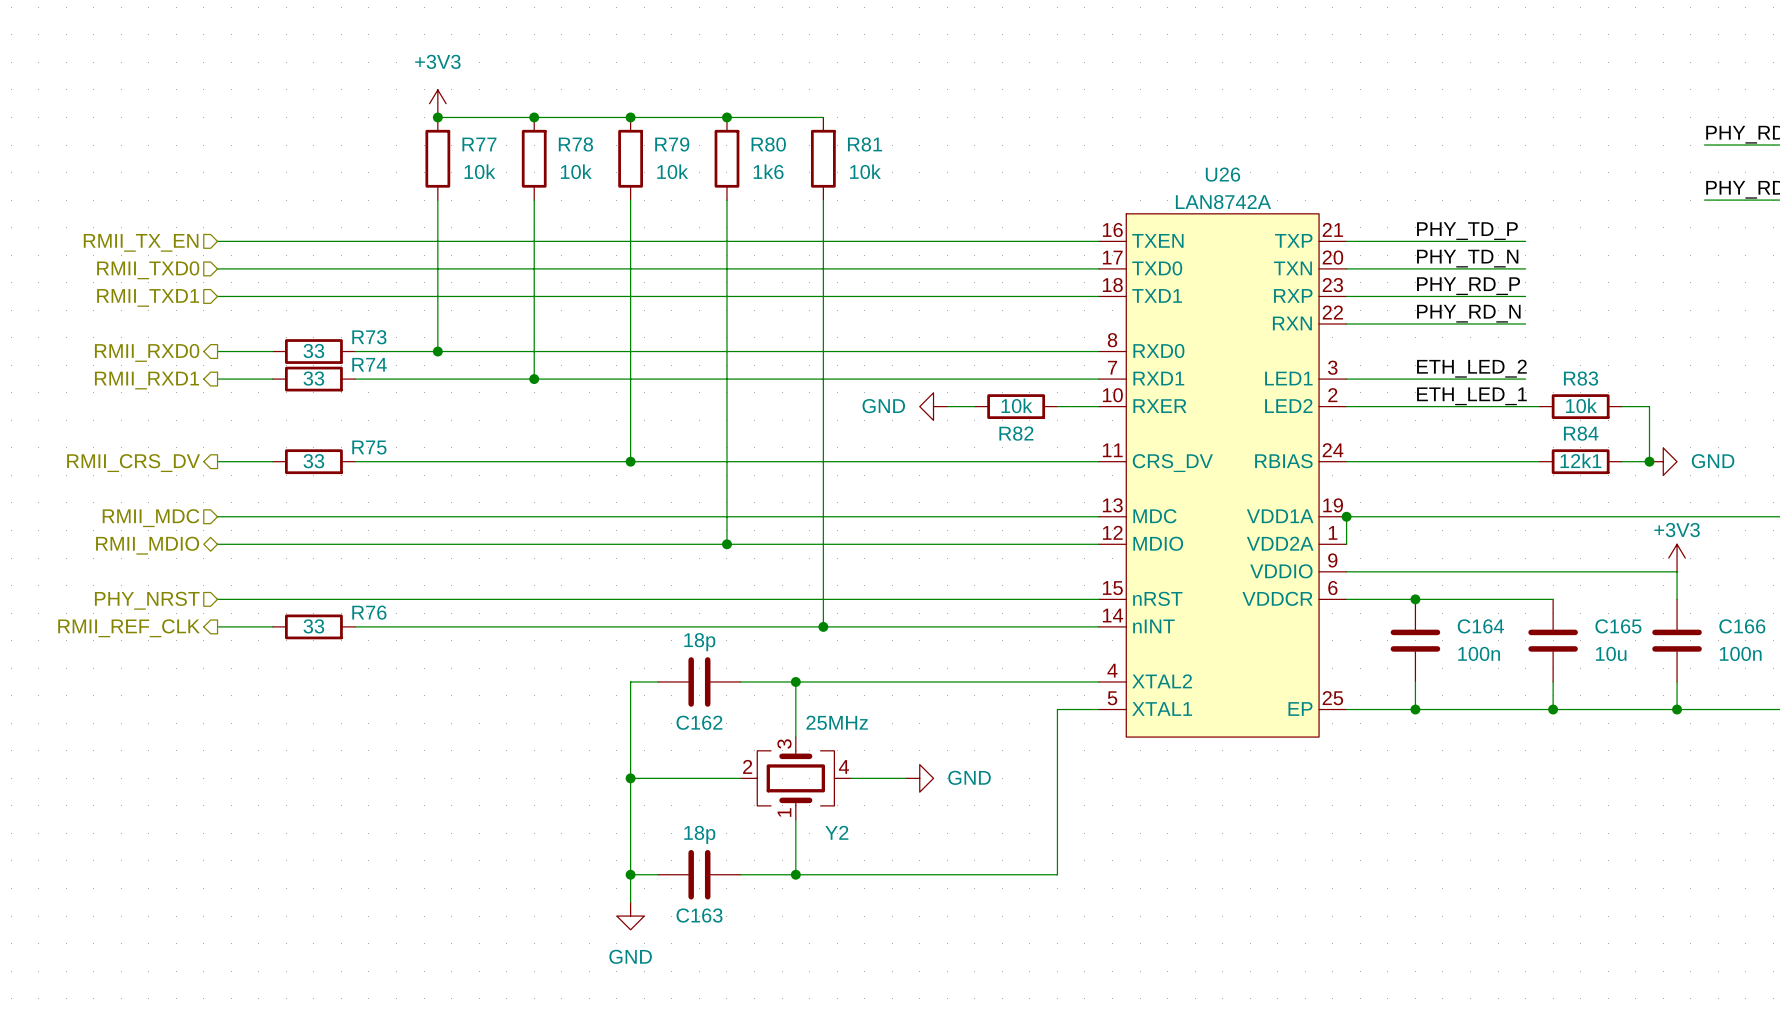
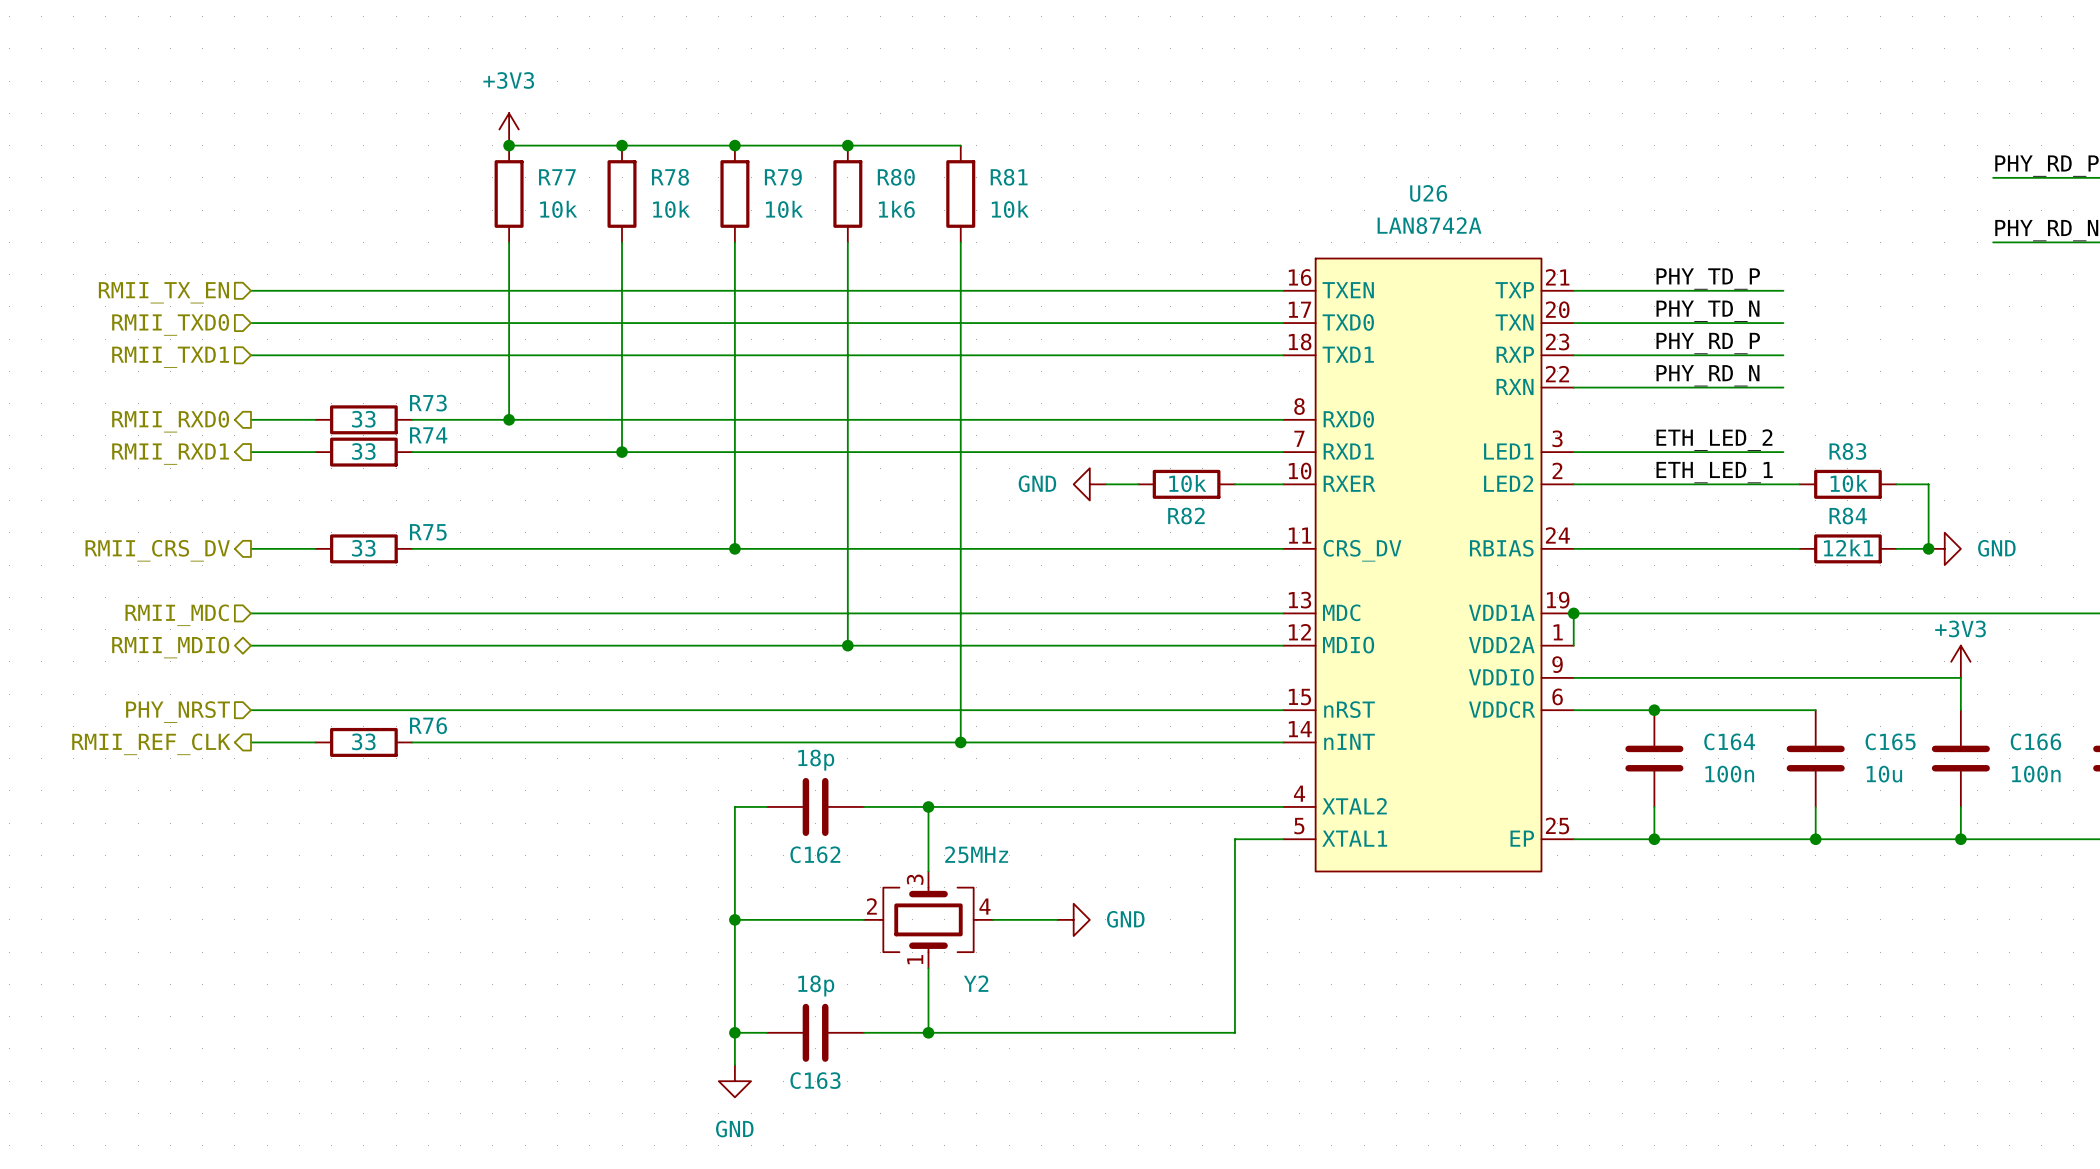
U26 name position: U26 (1222, 174) -> U26 (1428, 193)
U26 value position: LAN8742A (1223, 202) -> LAN8742A (1429, 225)

